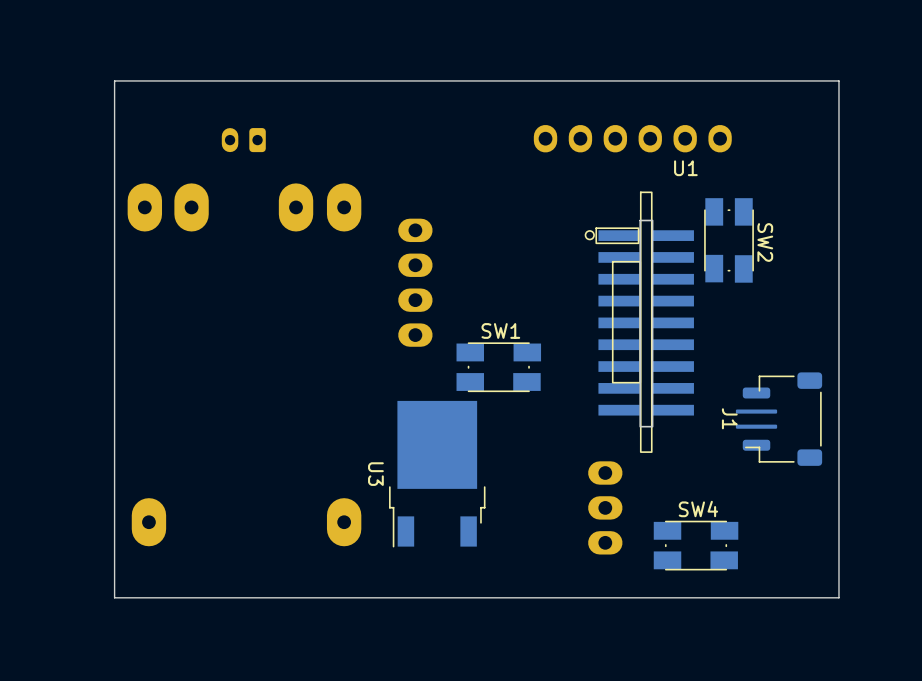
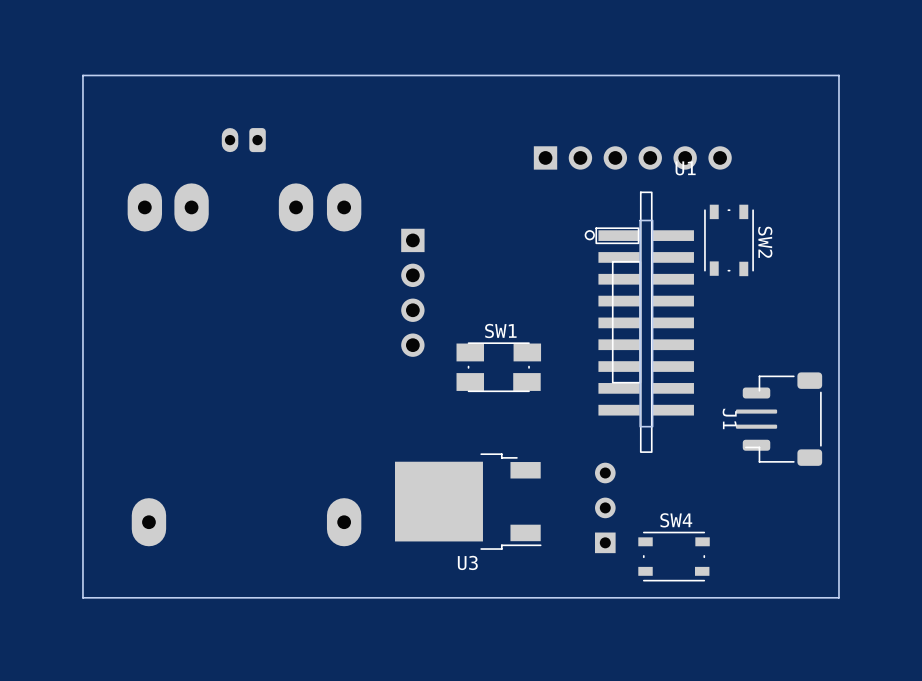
board edge: (838, 80) (114, 80) (114, 597) -> (838, 80) (838, 75) (82, 75) (82, 597) (114, 597)
part: (632, 138) -> none
part: none -> (632, 157)
SW2 footprint: [704, 198, 754, 283] -> [704, 204, 754, 277]
part footprint: [398, 218, 433, 347] -> [401, 228, 425, 357]
part footprint: [588, 461, 623, 555] -> [595, 462, 616, 554]
U3 rotation: 0° (437, 474) -> 90° counterclockwise (468, 501)
SW4 footprint: [653, 520, 739, 571] -> [638, 531, 710, 582]

